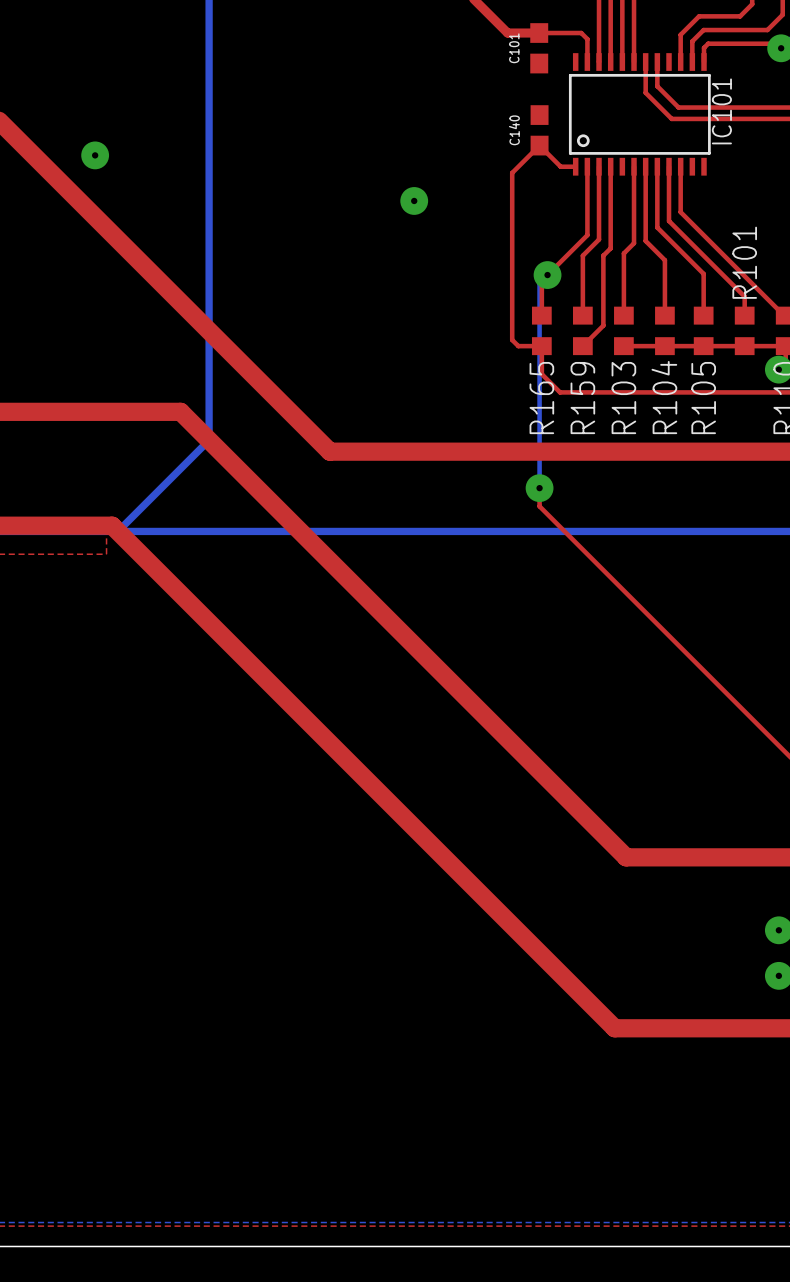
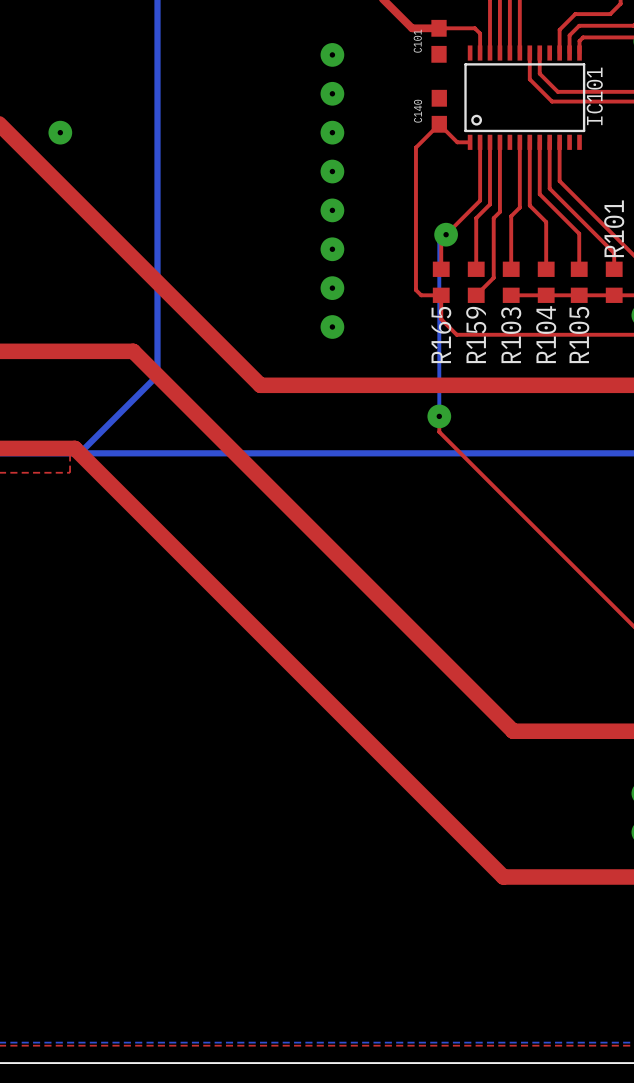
via: none -> (332, 54)
via: none -> (332, 93)
via: none -> (332, 132)
via: none -> (332, 210)
via: none -> (332, 249)
via: none -> (332, 288)
via: none -> (332, 327)

